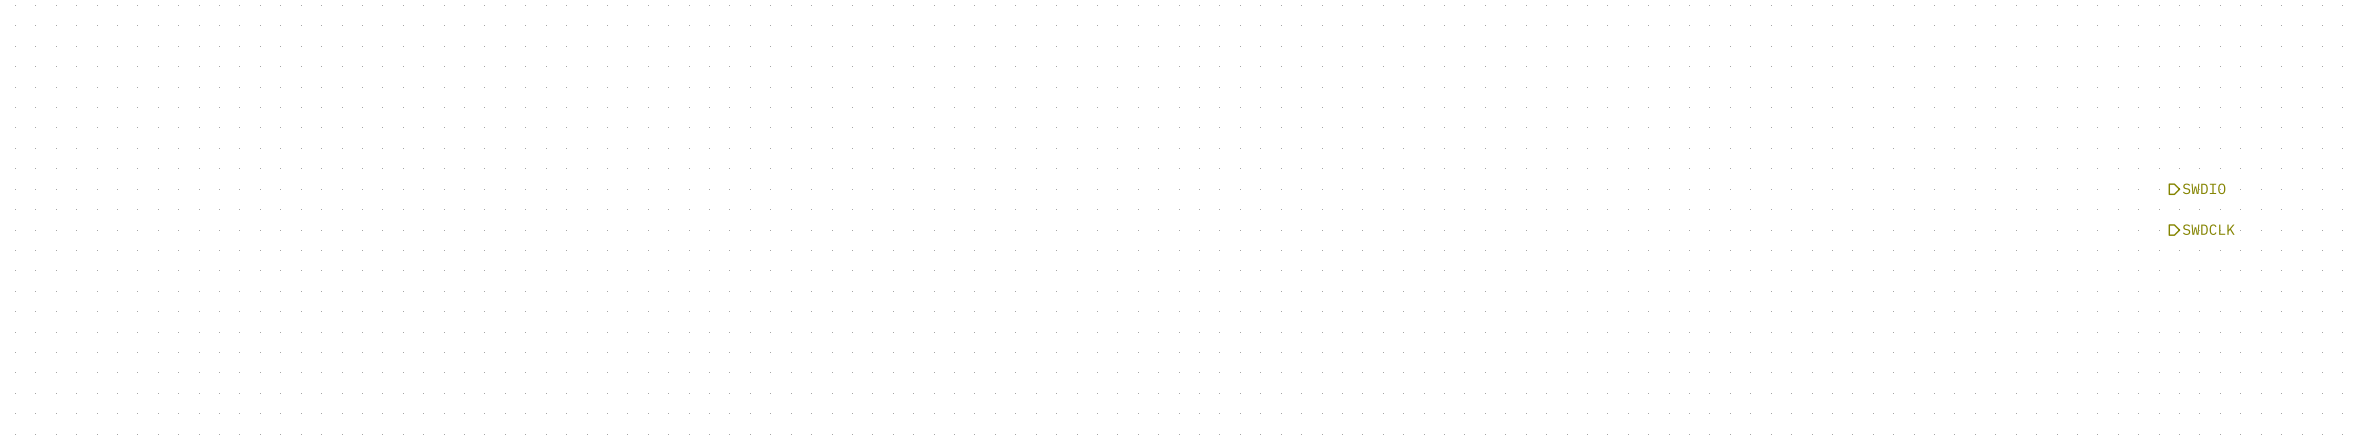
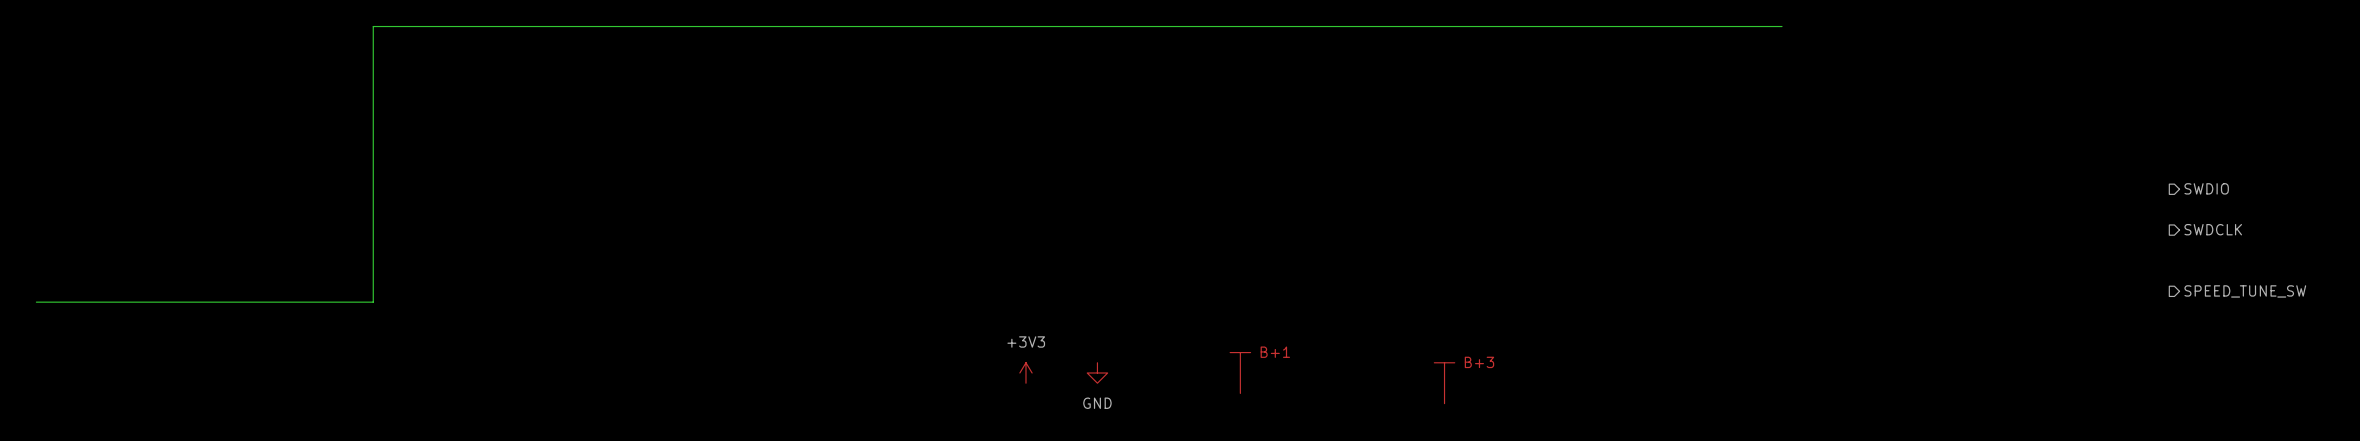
wire: none -> (1782, 26) (373, 26) (373, 302) (36, 302)
hierarchical label: none -> SPEED_TUNE_SW (2245, 291)
power symbol: none -> +3V3 (1025, 372)
power symbol: none -> GND (1097, 372)
power symbol: none -> (1240, 372)
power symbol: none -> (1444, 383)

